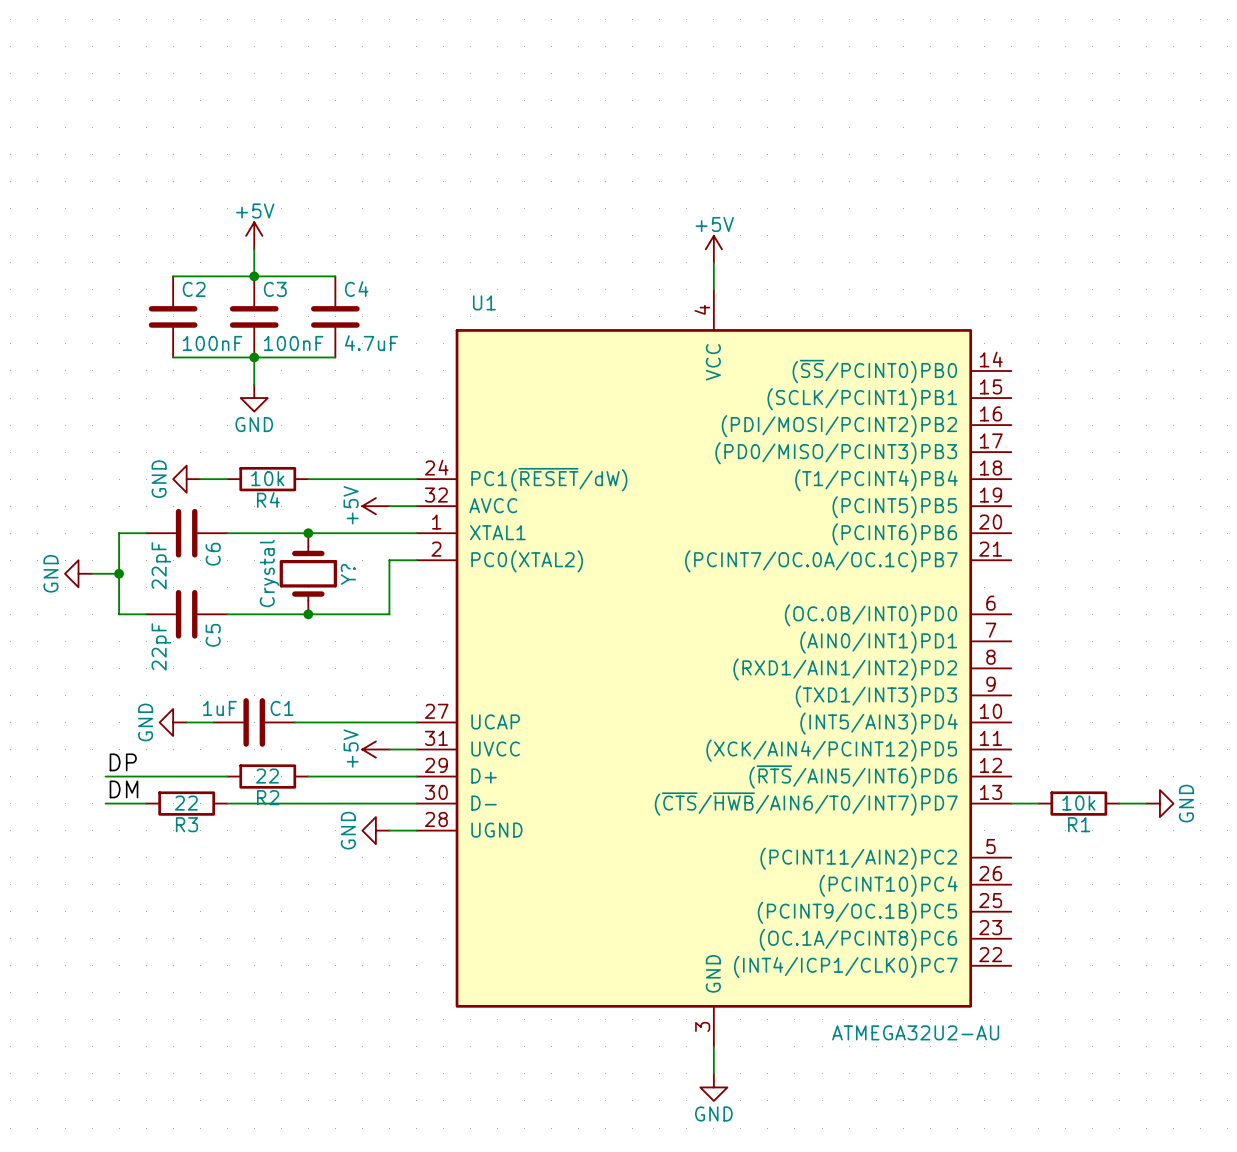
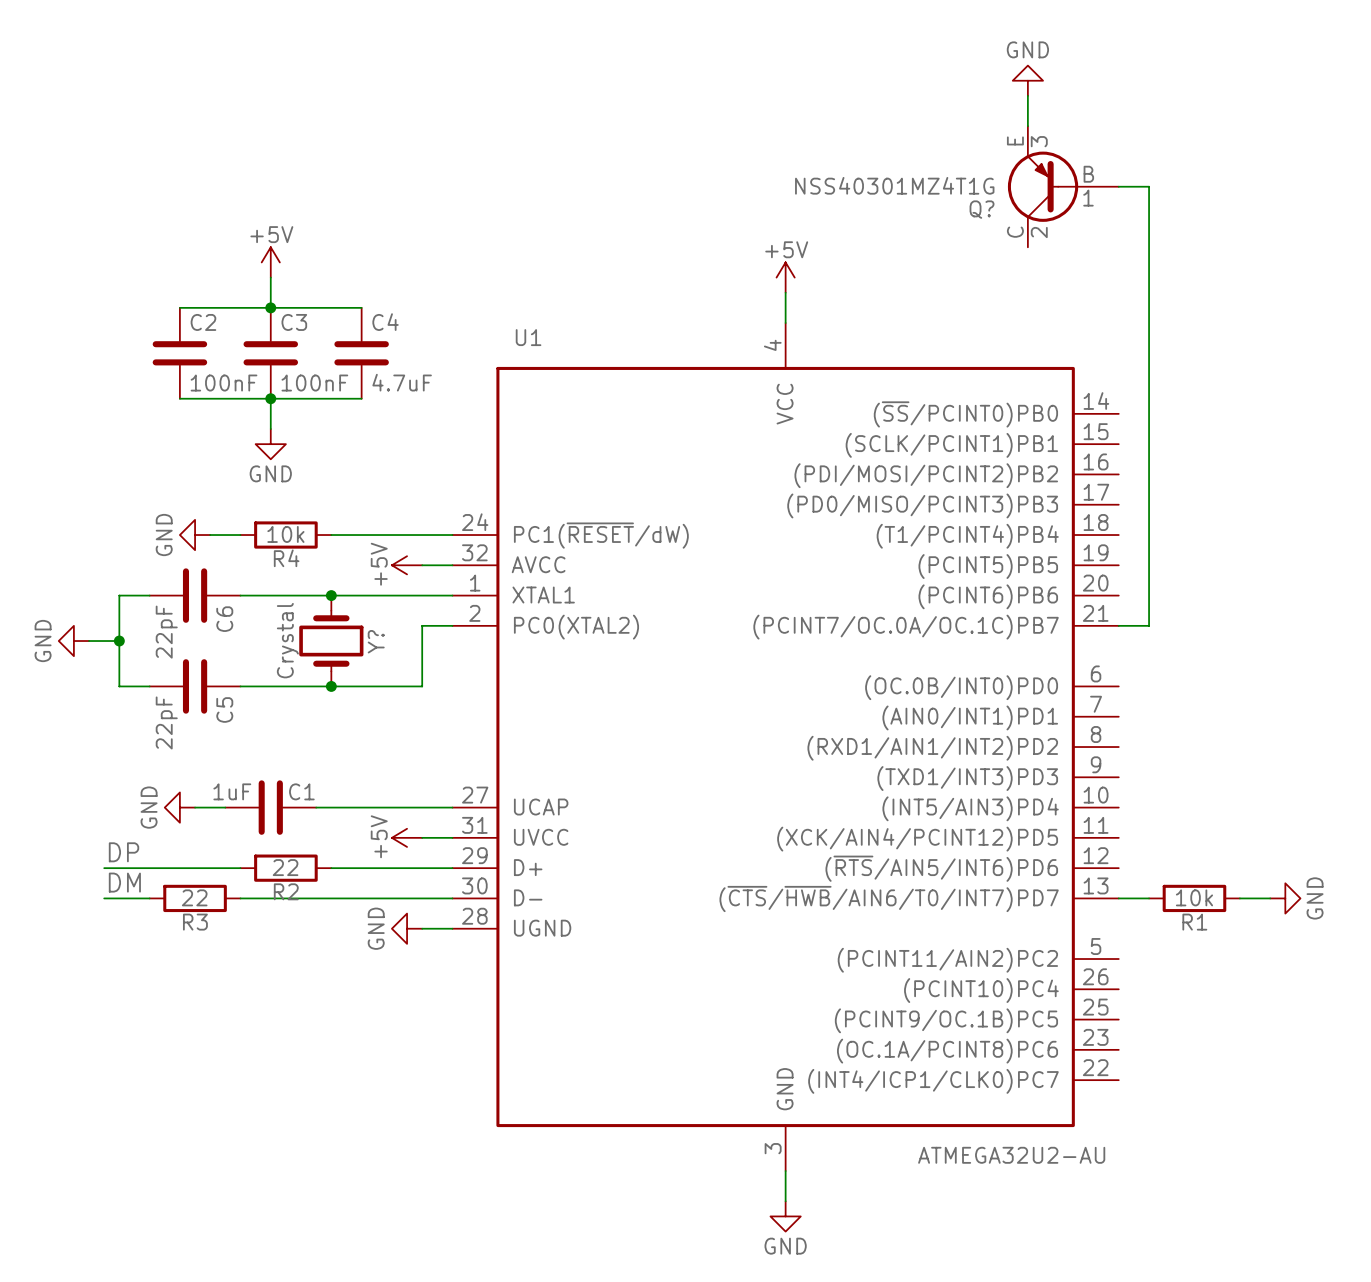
power symbol: none -> GND (1027, 80)
wire: none -> (1027, 95) (1027, 126)
Q?: none -> NSS40301MZ4T1G (1063, 186)
wire: none -> (1118, 186) (1149, 186) (1149, 625) (1118, 625)

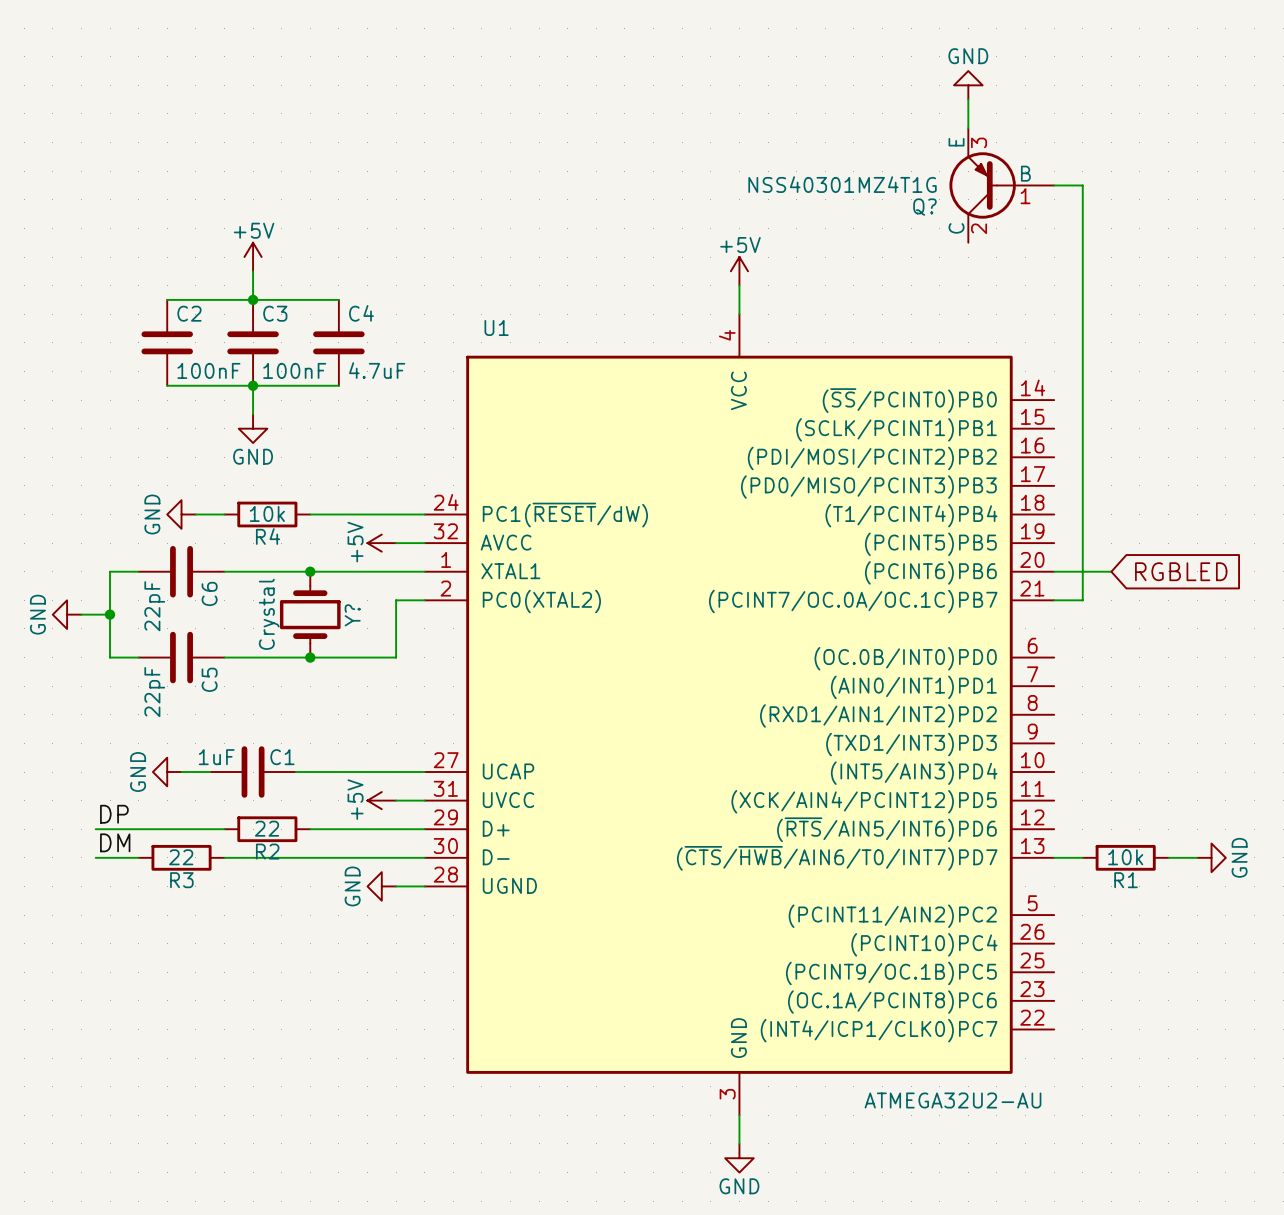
wire: none -> (1054, 571) (1111, 571)
global label: none -> RGBLED (1181, 571)

